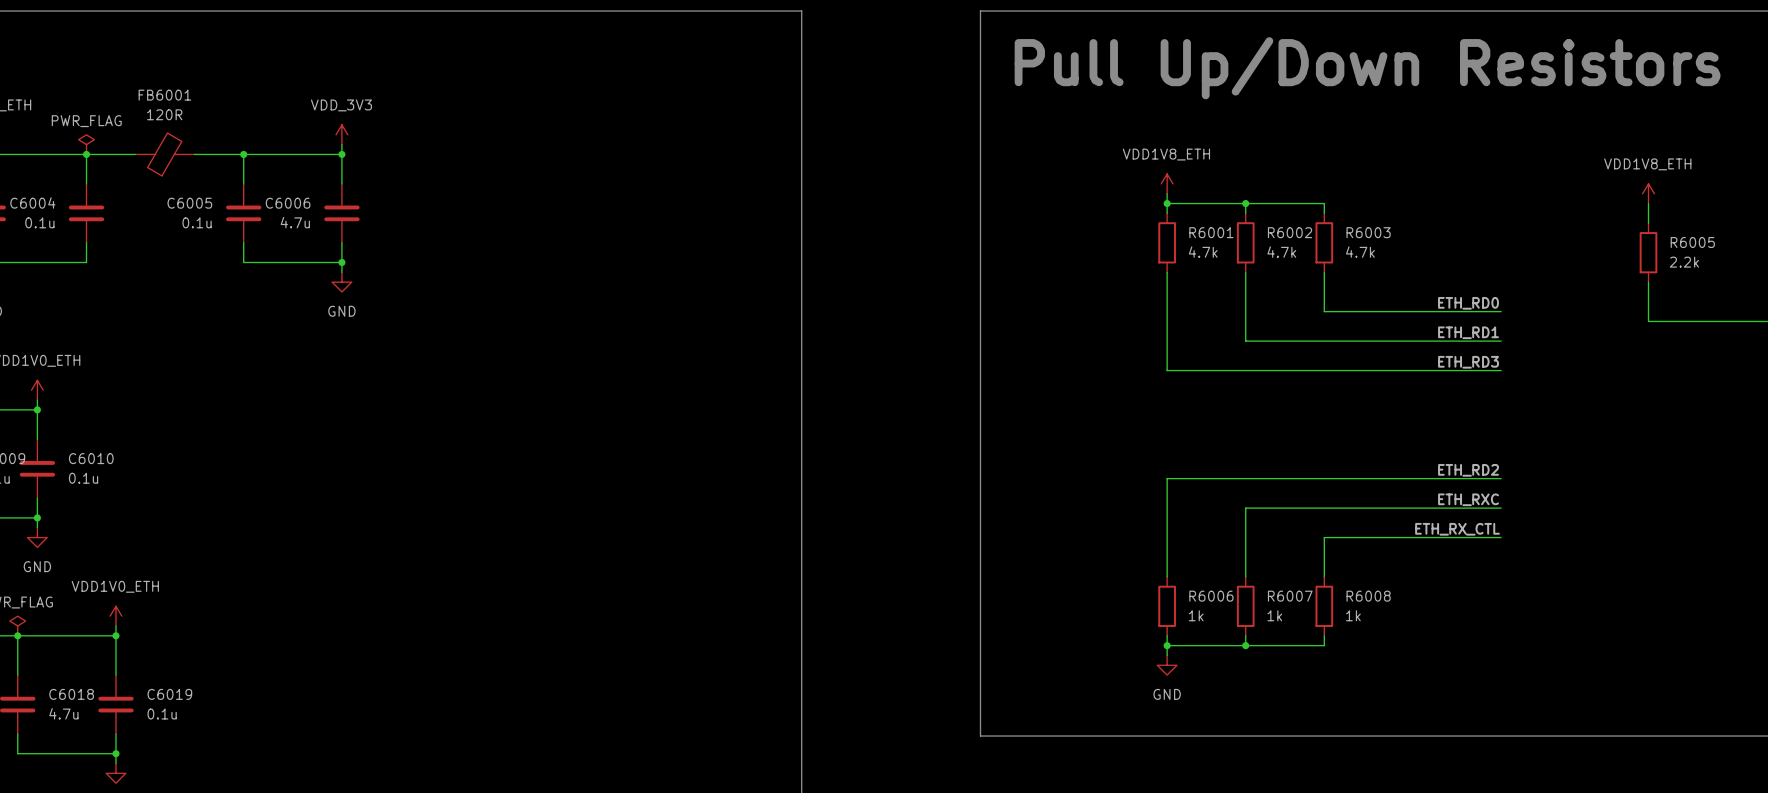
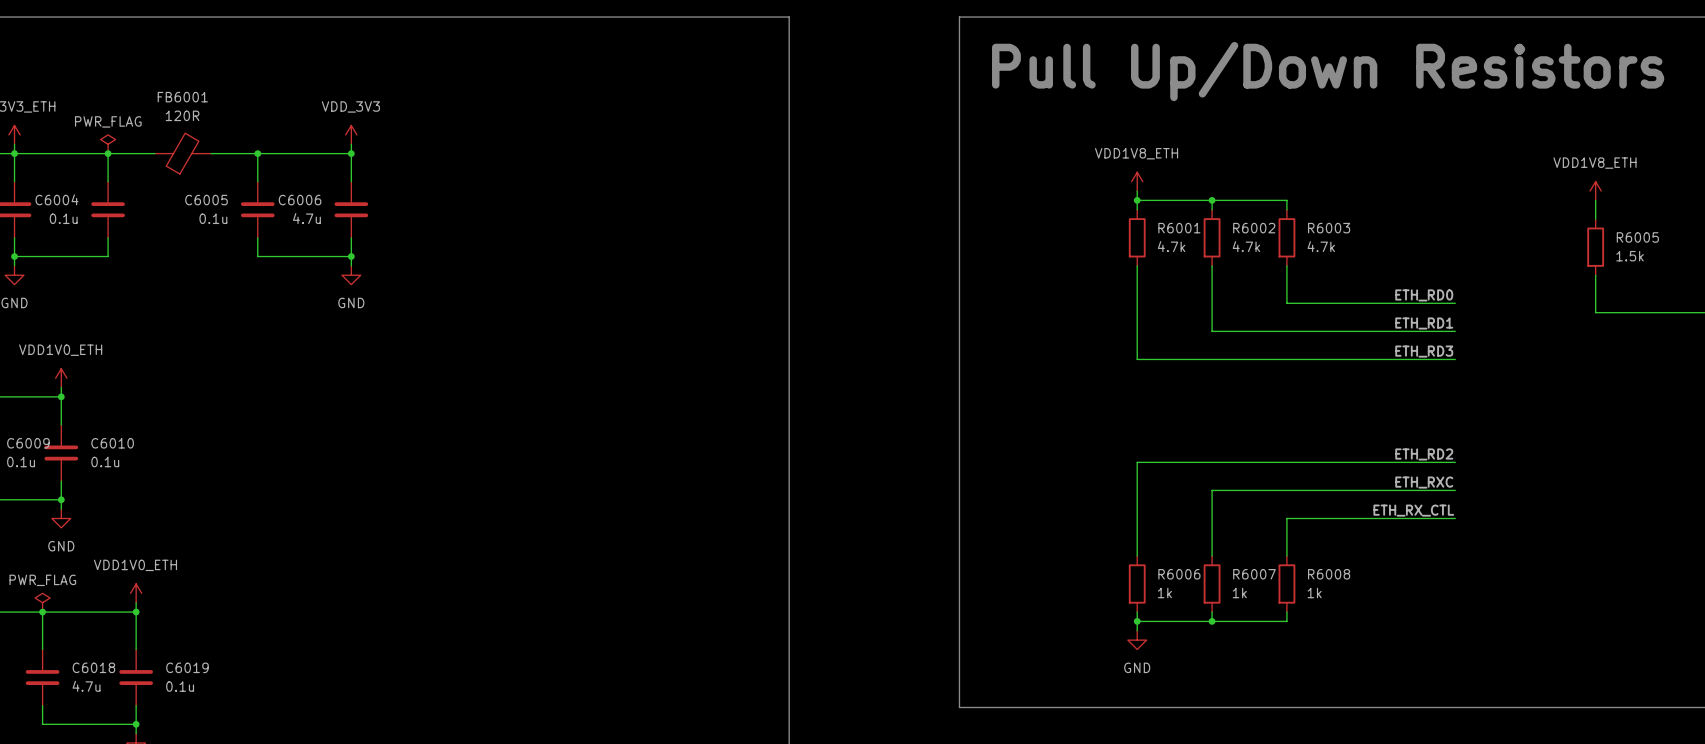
R6005 value: 2.2k (1684, 262) -> 1.5k (1630, 256)

